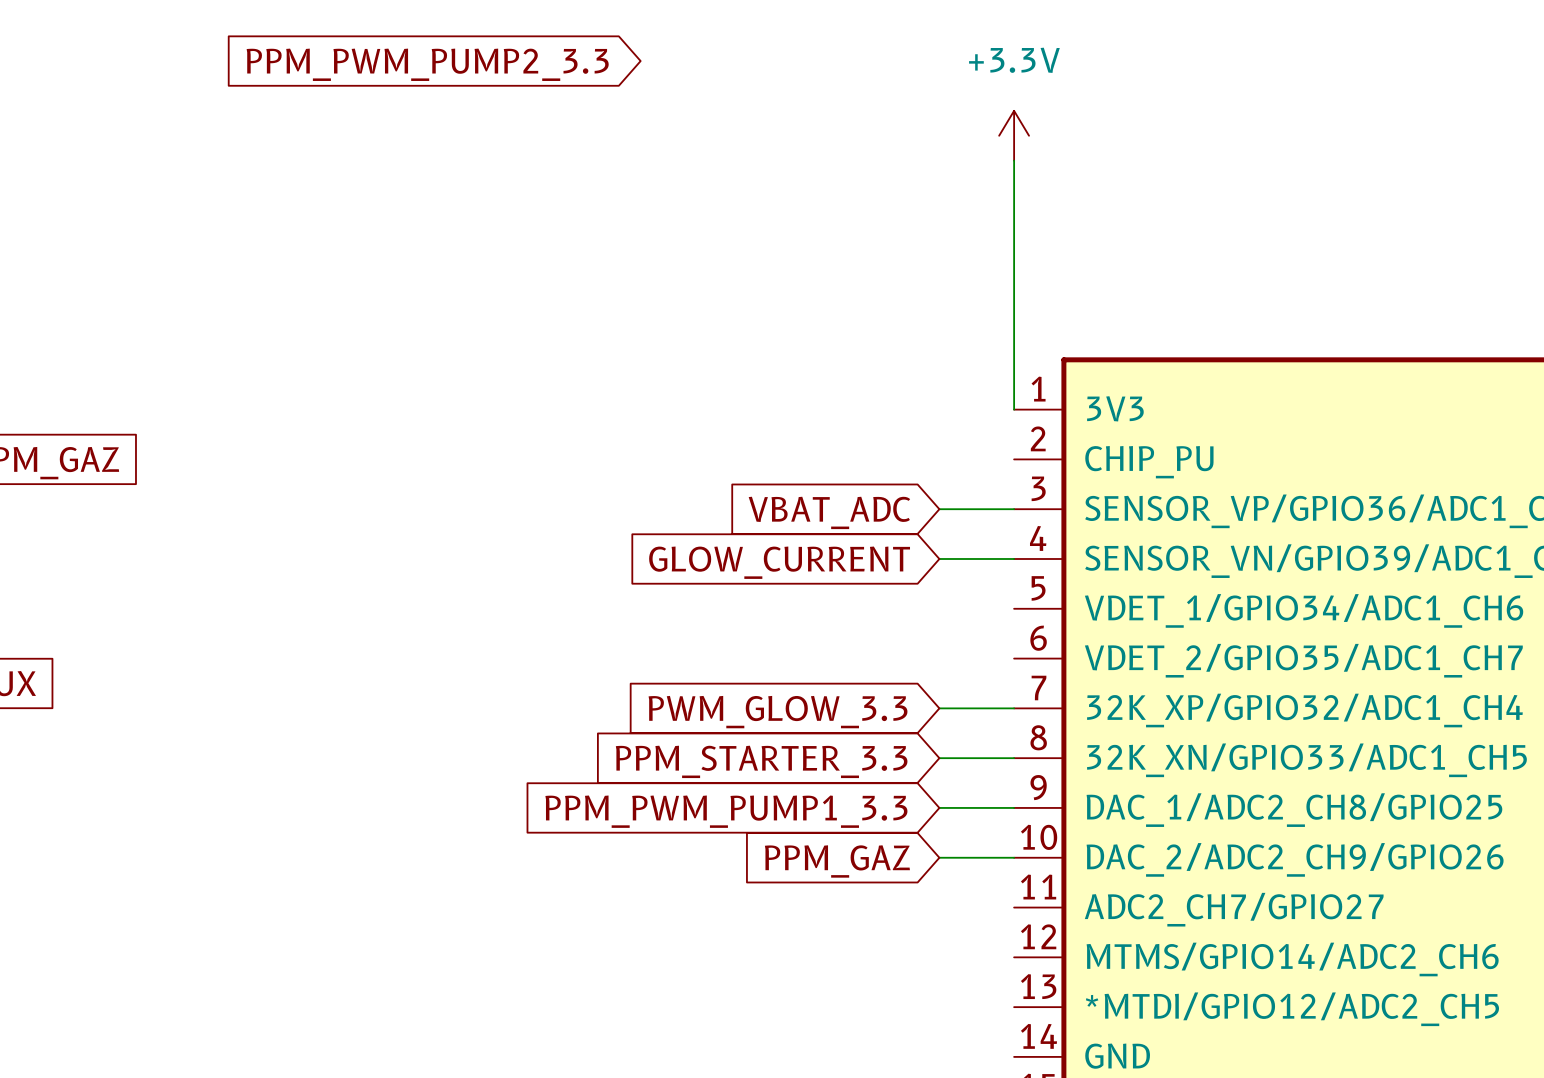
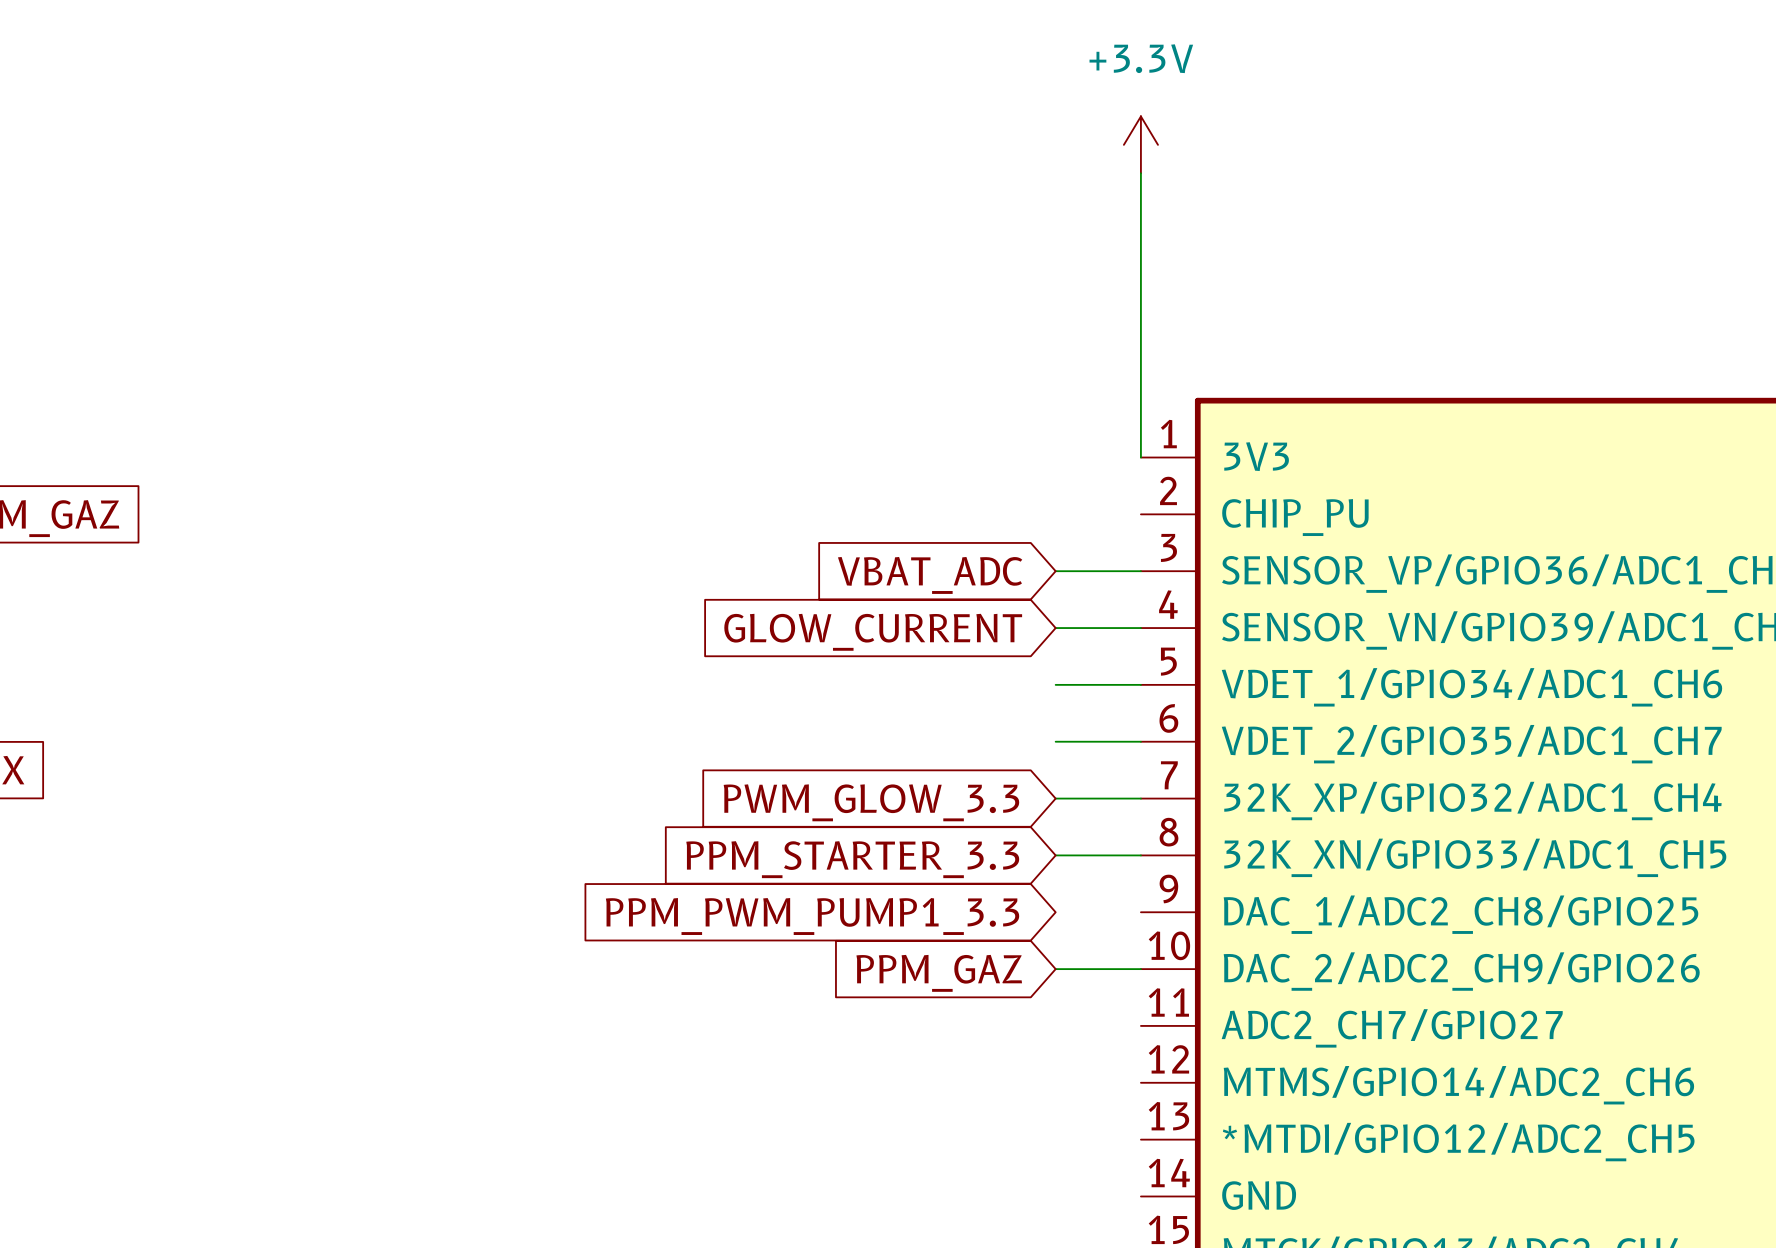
global label: PPM_PWM_PUMP2_3.3 (427, 64) -> none
wire: none -> (1055, 684) (1140, 684)
wire: (939, 807) (1014, 807) -> (1055, 741) (1140, 741)

